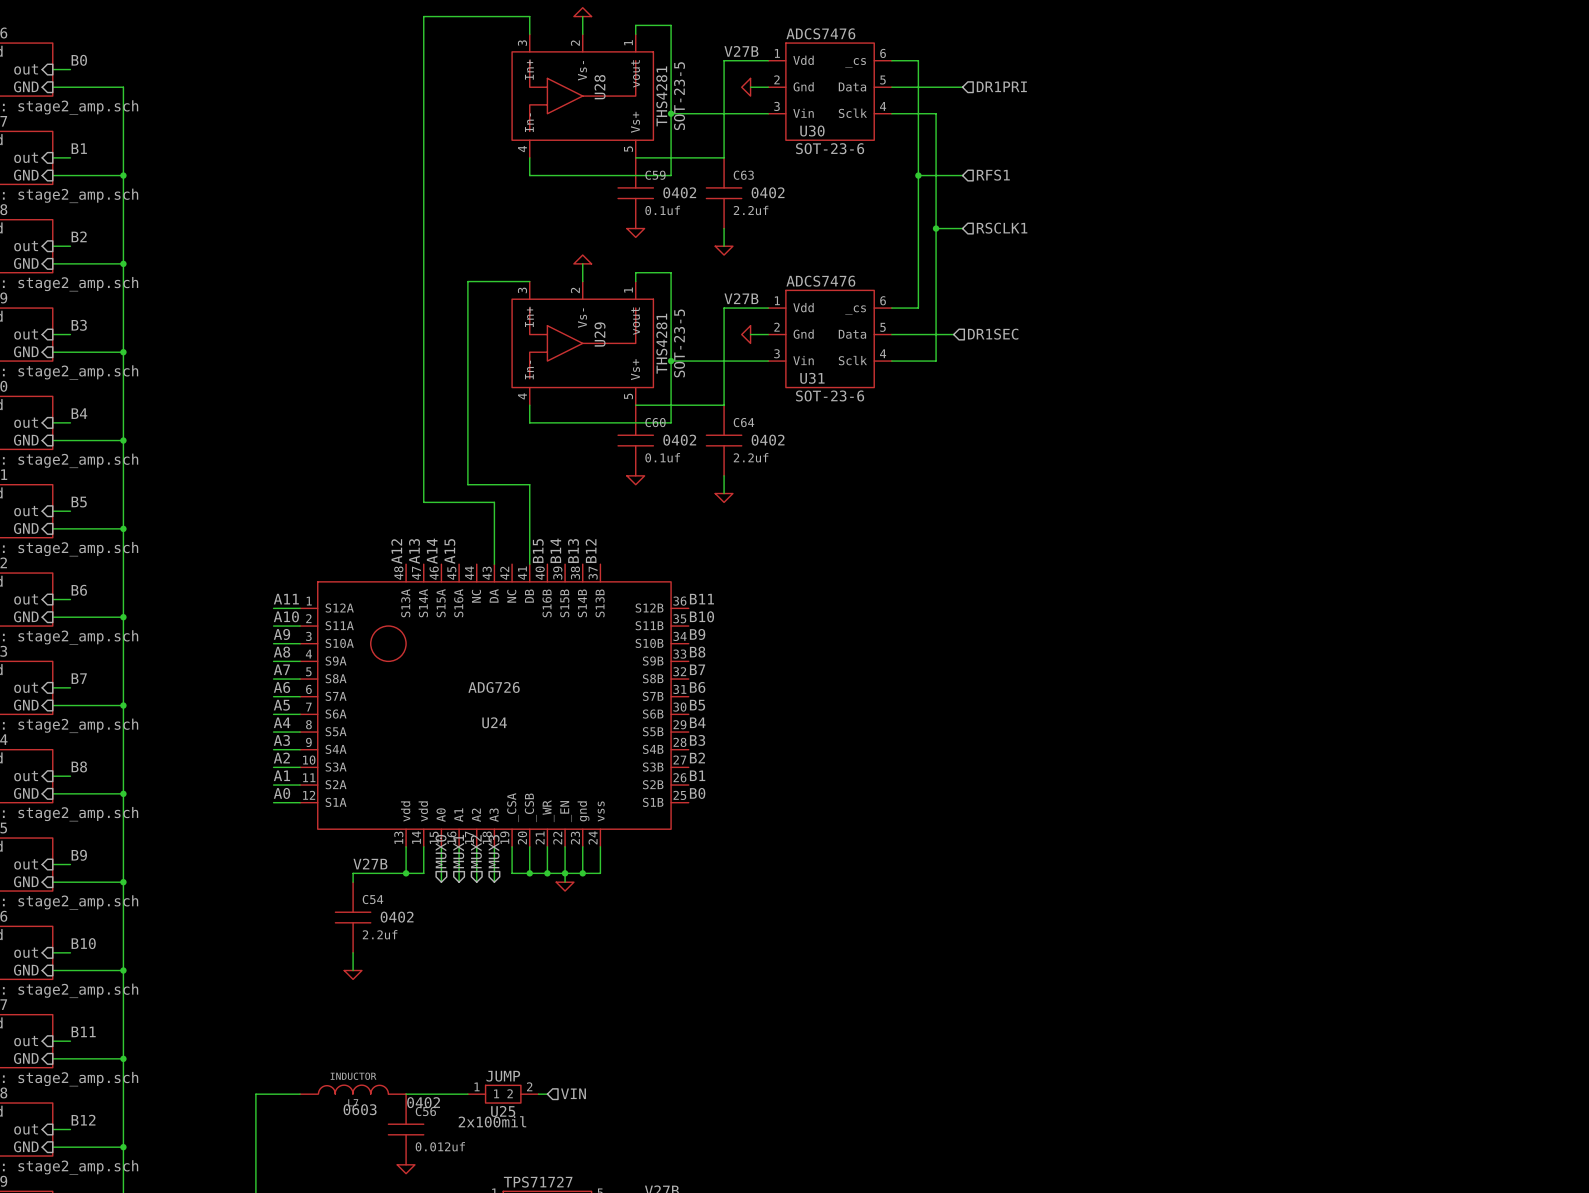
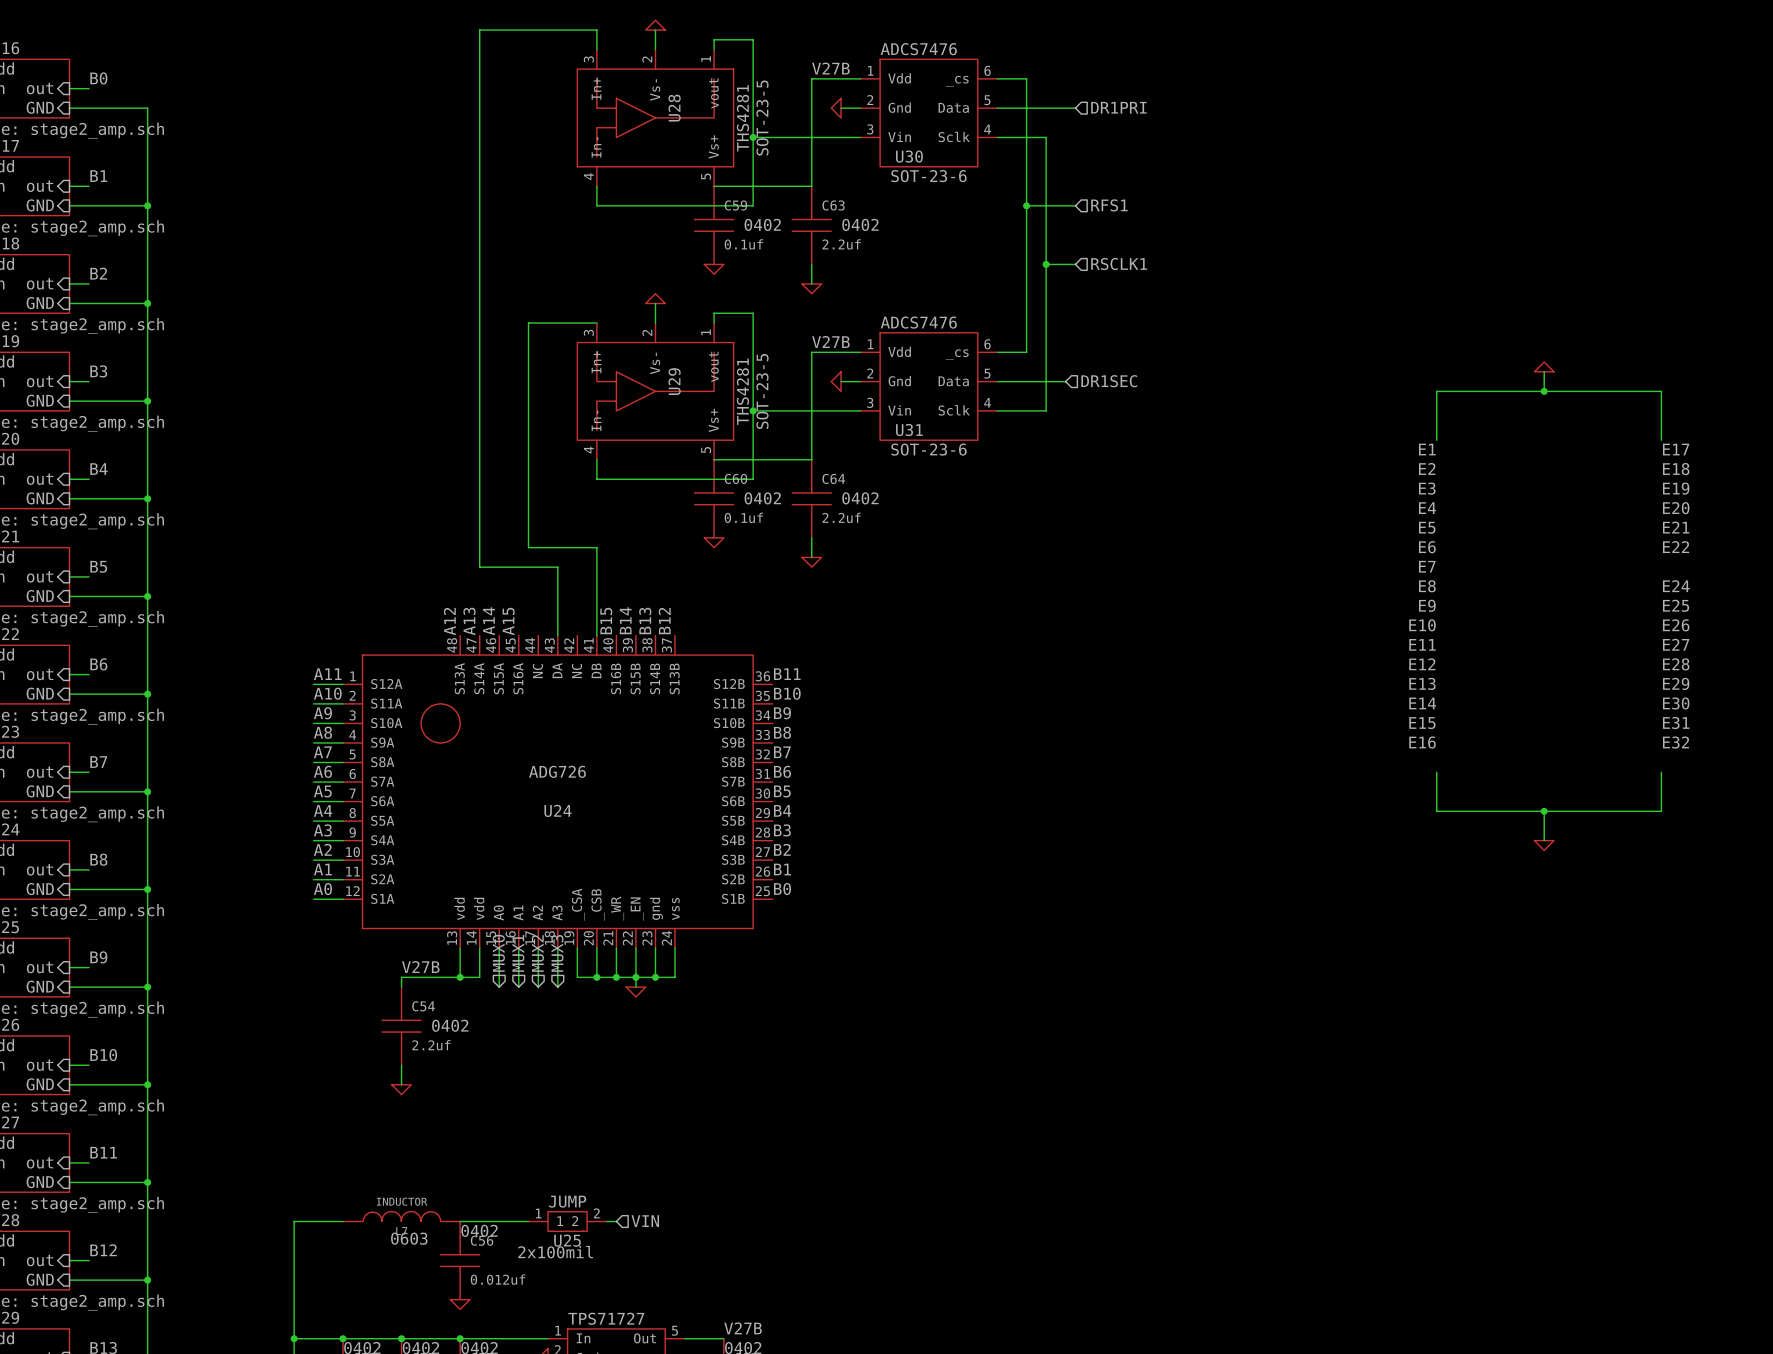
power symbol: none -> (1544, 366)
wire: none -> (1544, 371) (1544, 391)
junction: none -> (1544, 391)
wire: none -> (1436, 440) (1436, 391) (1661, 391) (1661, 440)
label: none -> E1 (1427, 449)
label: none -> E17 (1676, 449)
label: none -> E2 (1427, 468)
label: none -> E18 (1676, 469)
label: none -> E3 (1427, 488)
label: none -> E19 (1676, 488)
label: none -> E4 (1427, 508)
label: none -> E20 (1676, 508)
label: none -> E5 (1427, 527)
label: none -> E21 (1676, 527)
label: none -> E6 (1427, 547)
label: none -> E22 (1676, 547)
label: none -> E7 (1427, 566)
label: none -> E8 (1427, 586)
label: none -> E24 (1676, 586)
label: none -> E9 (1427, 605)
label: none -> E25 (1676, 605)
label: none -> E10 (1422, 625)
label: none -> E26 (1676, 625)
label: none -> E11 (1422, 644)
label: none -> E27 (1676, 644)
label: none -> E12 (1422, 664)
label: none -> E28 (1676, 664)
label: none -> E13 (1422, 683)
label: none -> E29 (1676, 683)
label: none -> E14 (1422, 703)
label: none -> E30 (1676, 703)
label: none -> E15 (1422, 723)
label: none -> E31 (1676, 722)
label: none -> E16 (1422, 742)
label: none -> E32 (1676, 742)
wire: none -> (1436, 772) (1436, 811) (1661, 811) (1661, 772)
wire: none -> (1544, 811) (1544, 840)
junction: none -> (1544, 811)
power symbol: none -> (1544, 845)

